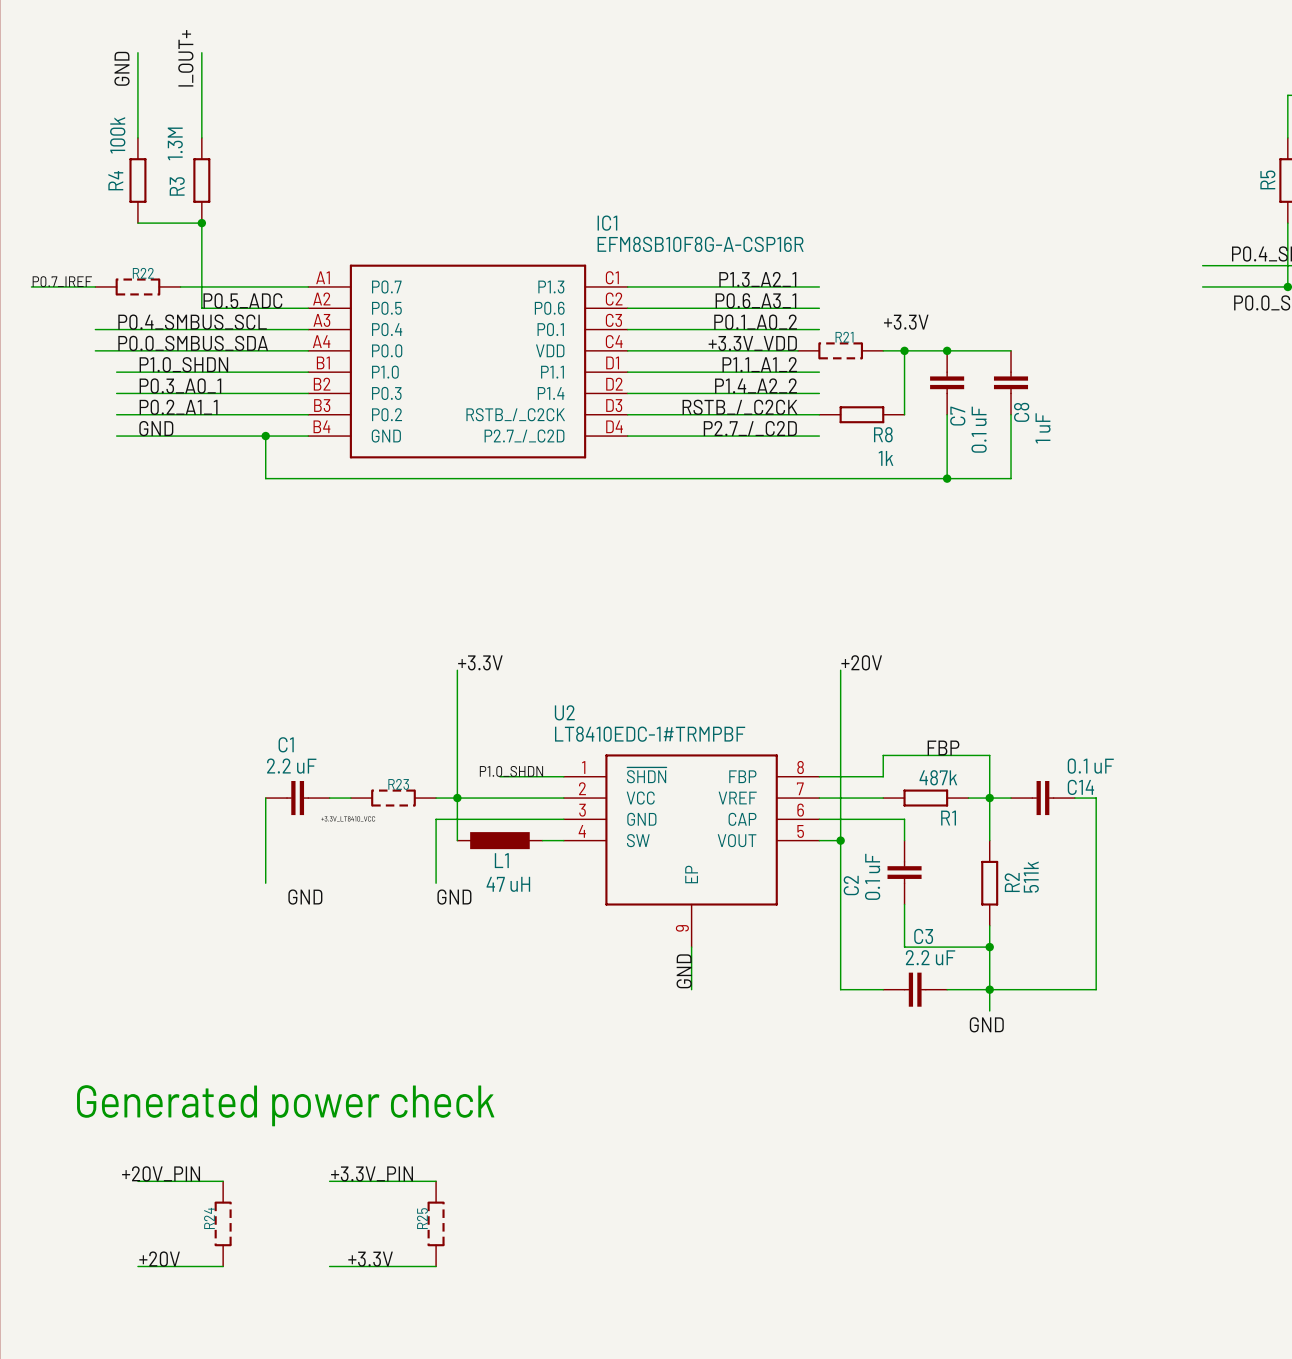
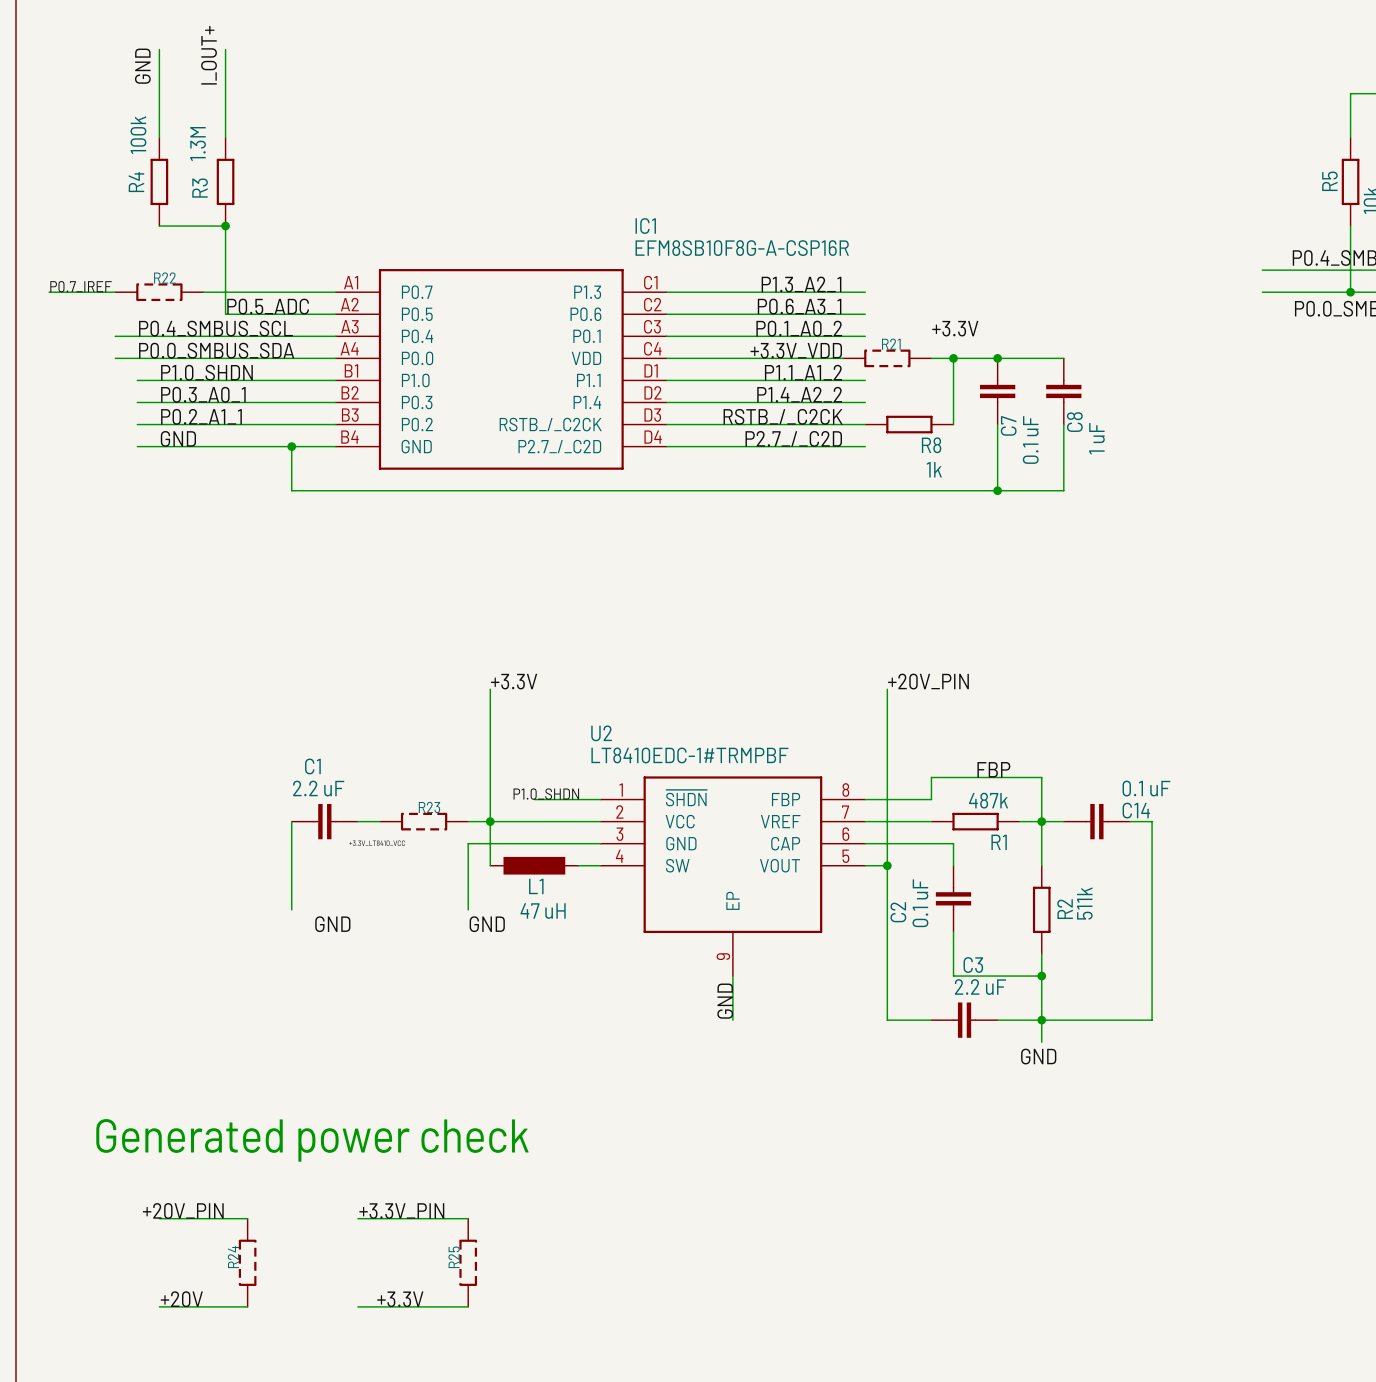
label: +20V (861, 662) -> +20V_PIN (928, 681)

